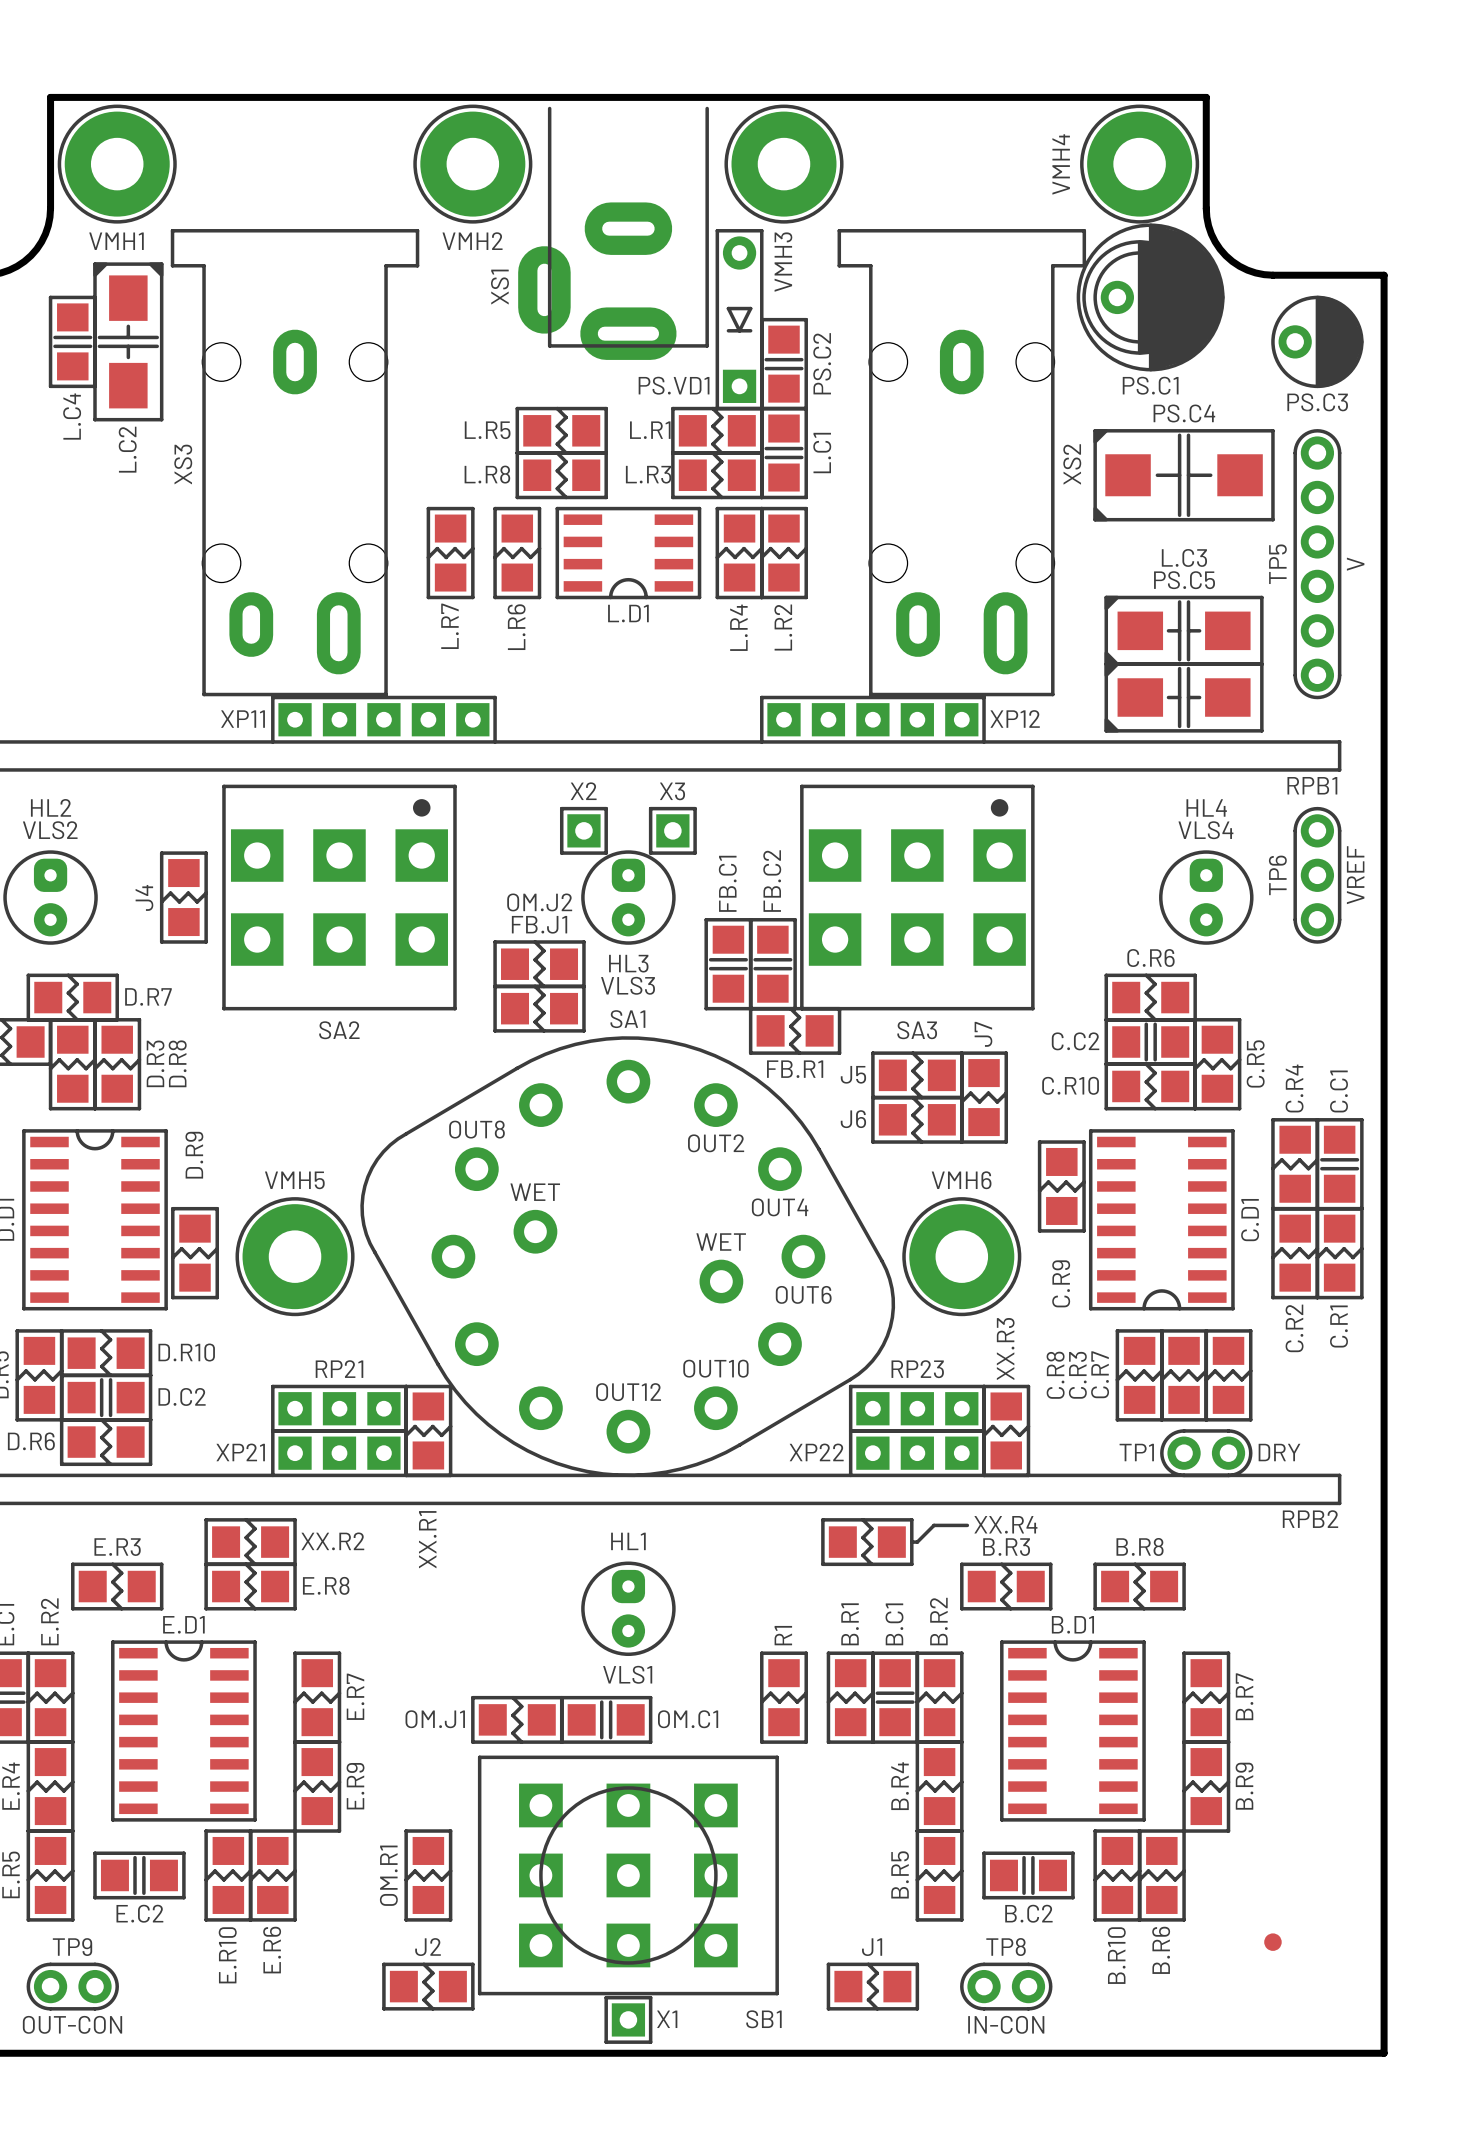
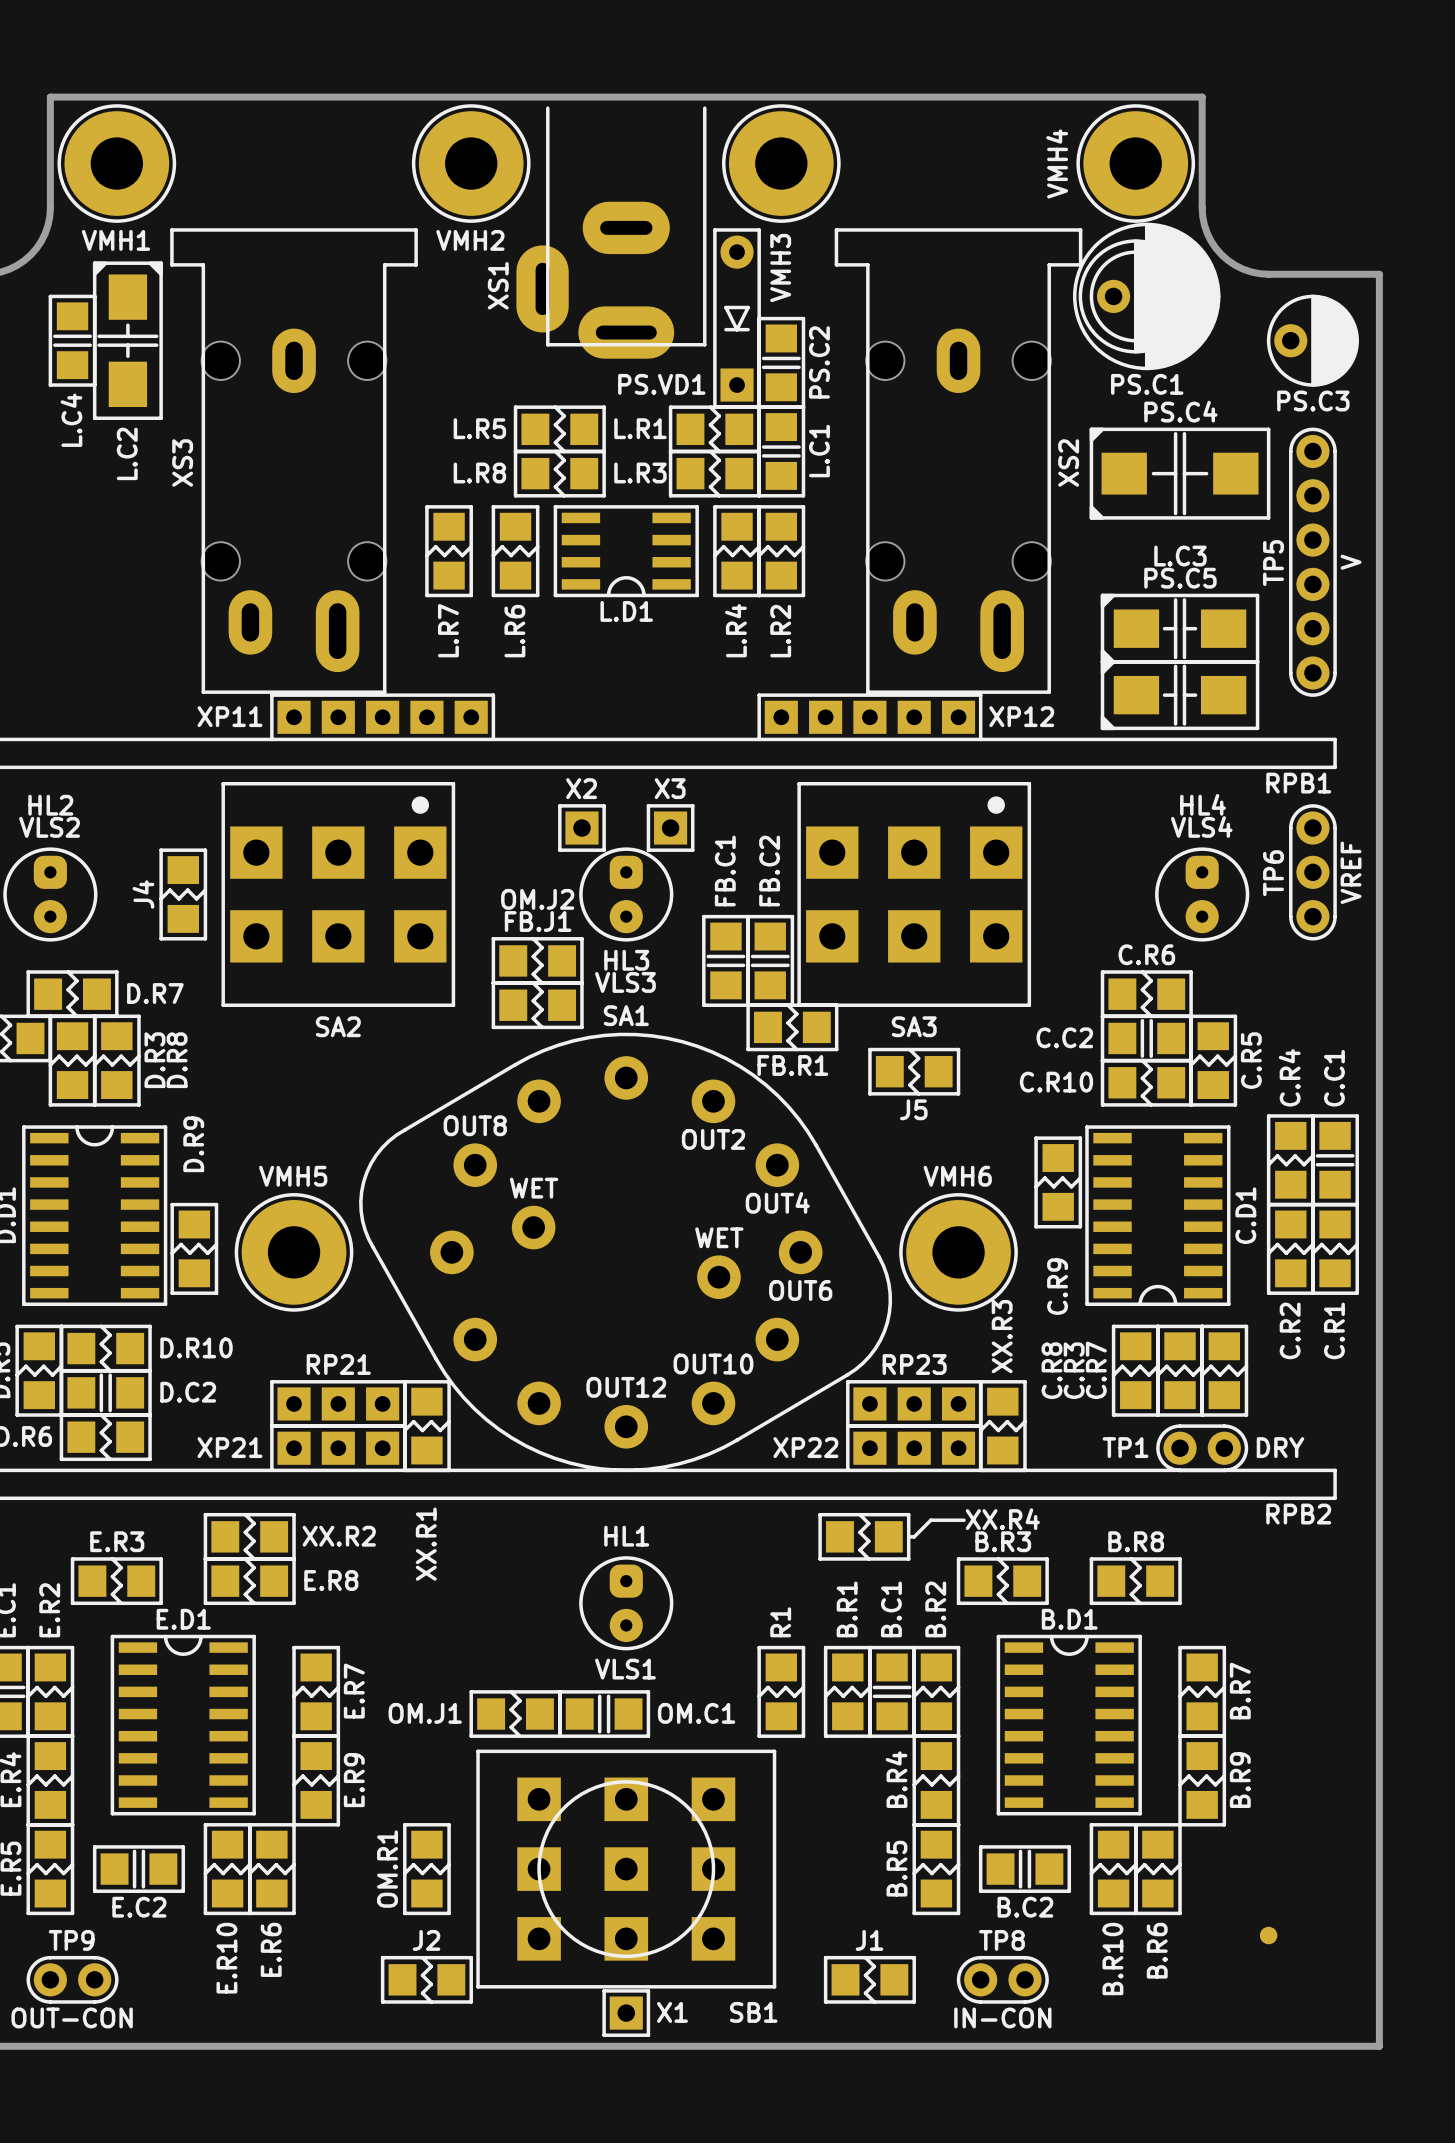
J5 name position: J5 (853, 1074) -> J5 (913, 1109)
J7: (984, 1097) -> none
J6: (917, 1119) -> none

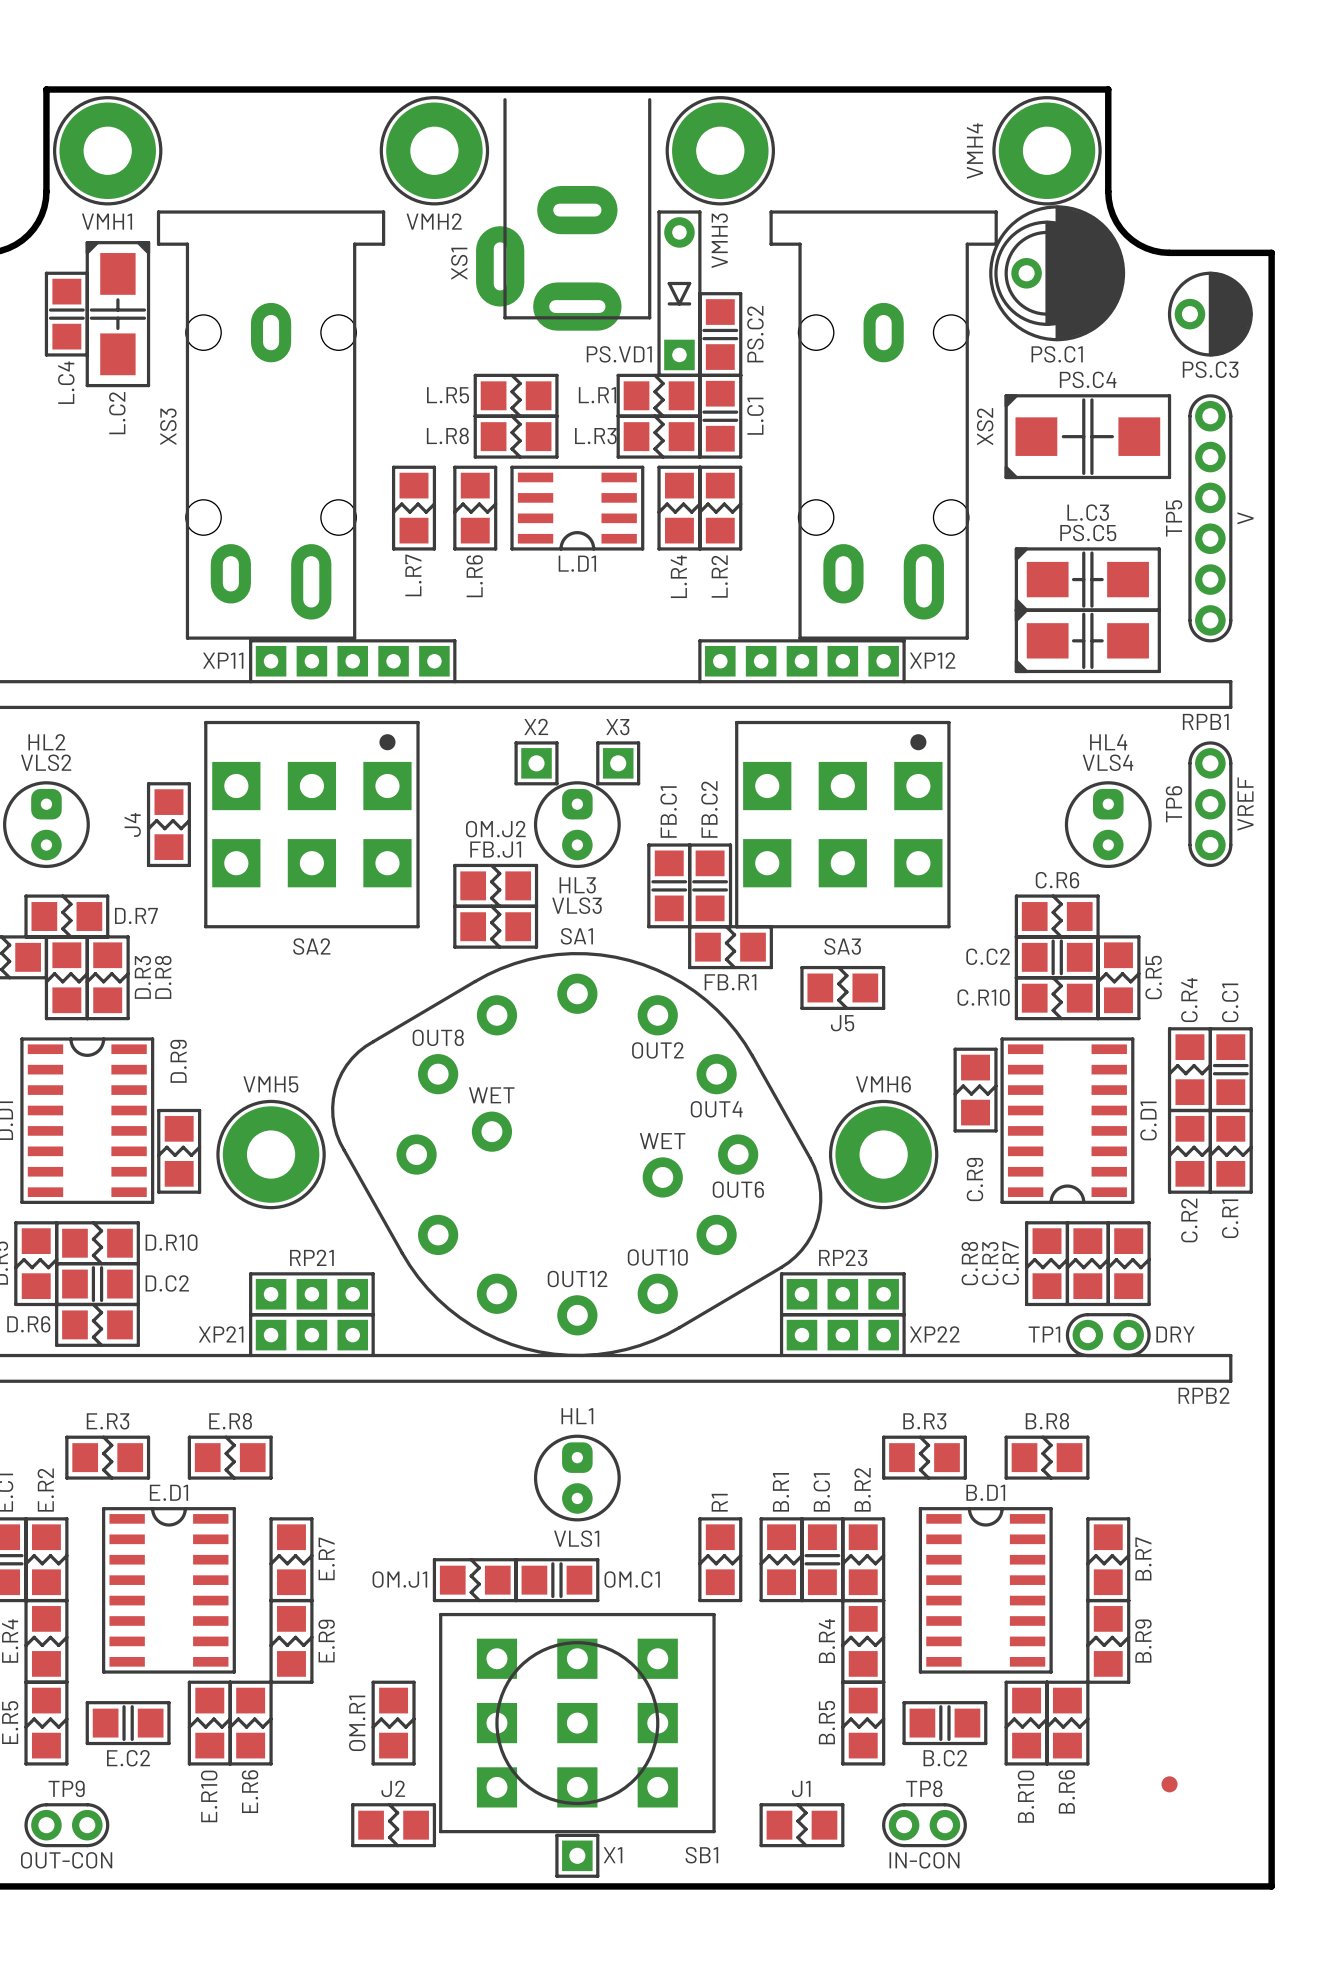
XX.R1: (426, 1426) -> none
XX.R3: (1002, 1426) -> none
RPB2 text position: XP22 (805, 1447) -> XP22 (934, 1334)
line: (964, 1520) (930, 1520) (914, 1536) (908, 1536) -> none
XX.R2: (249, 1536) -> none
XX.R4: (864, 1536) -> none
E.R8 name position: E.R8 (331, 1580) -> E.R8 (230, 1421)

